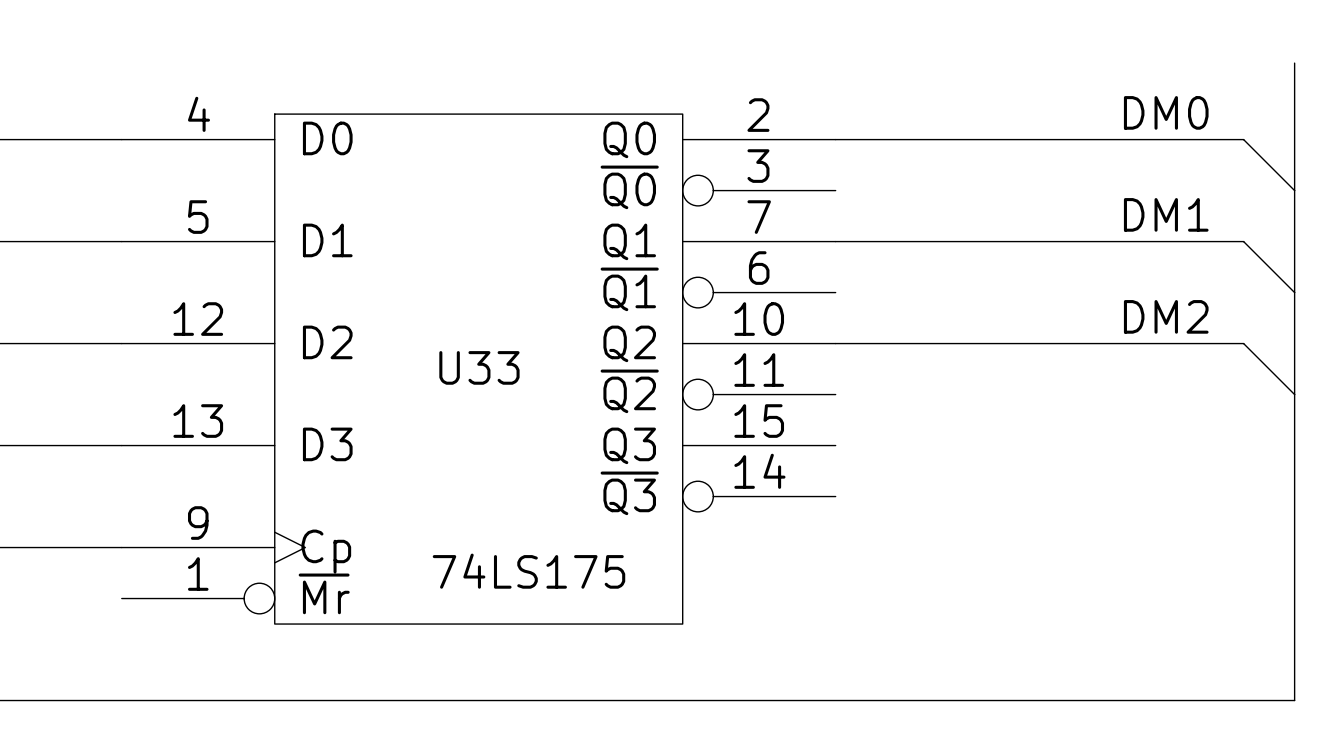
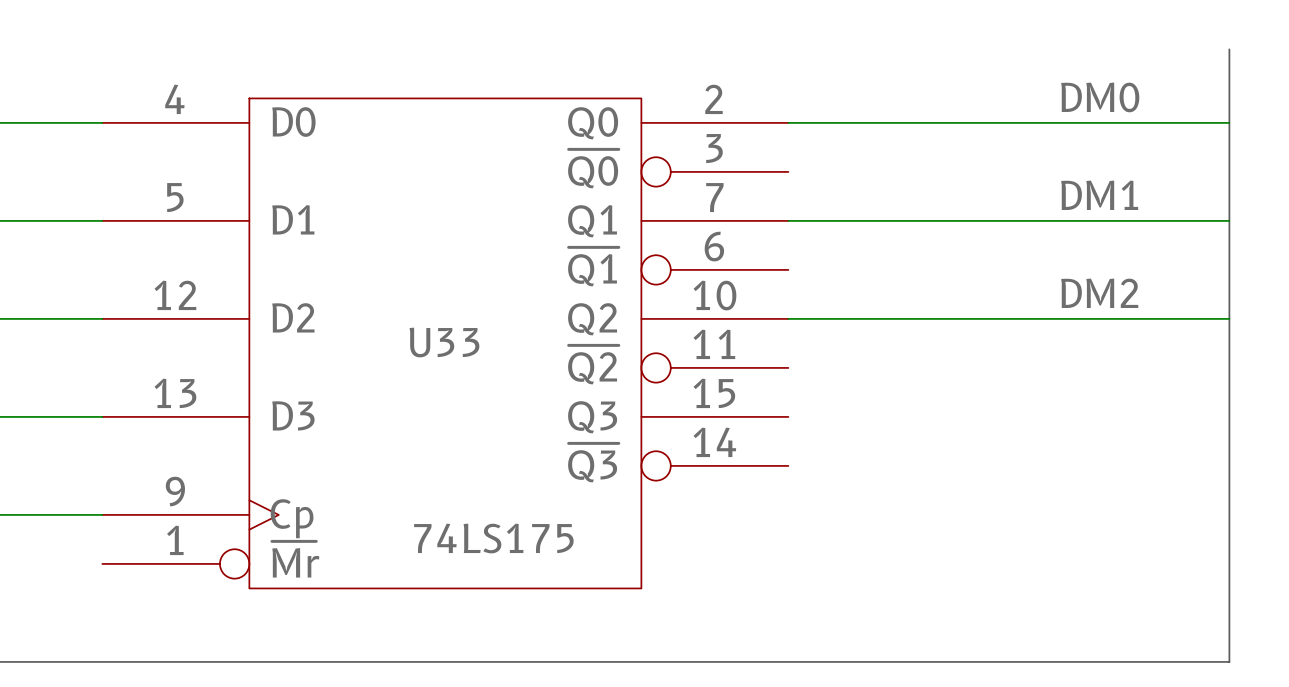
wire: (1243, 139) (1294, 190) -> (1180, 122) (1229, 122)
wire: (1243, 241) (1294, 292) -> (1180, 220) (1229, 220)
wire: (1243, 343) (1294, 394) -> (1180, 318) (1229, 318)

